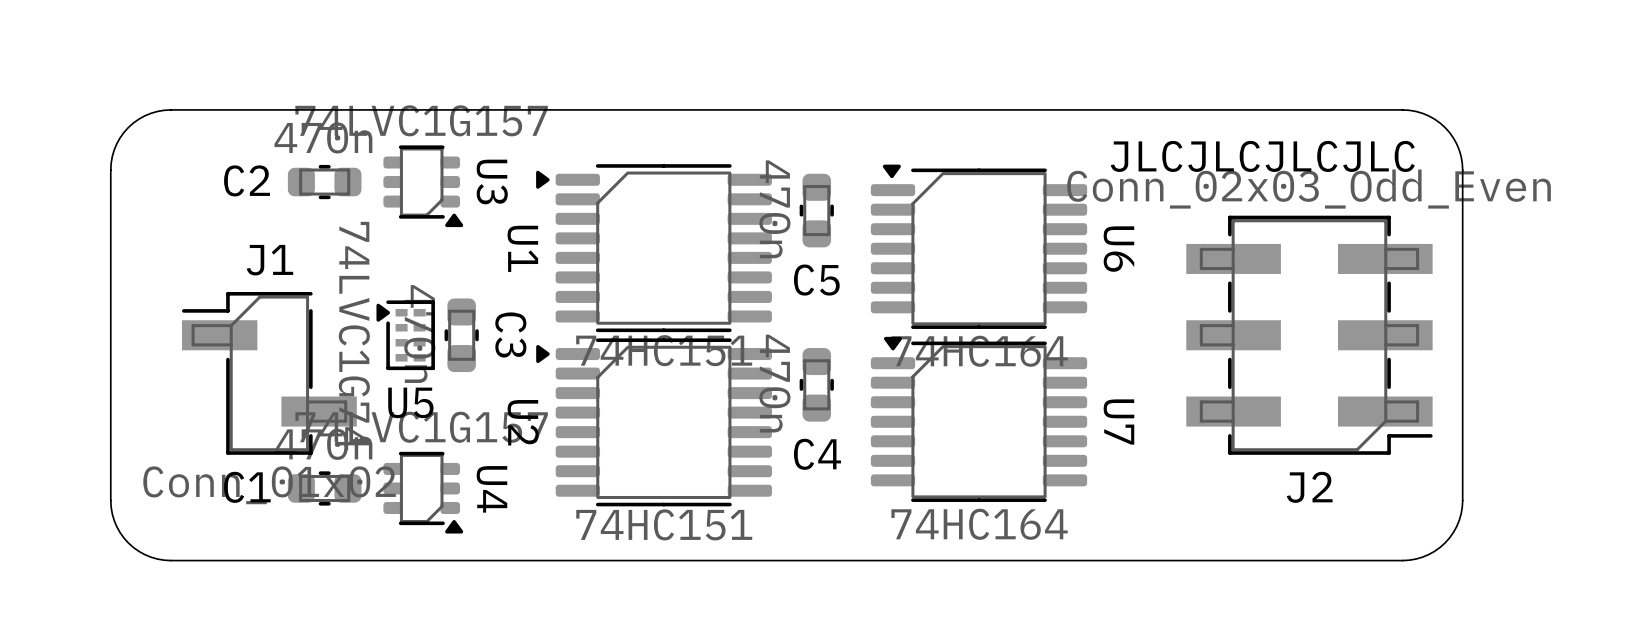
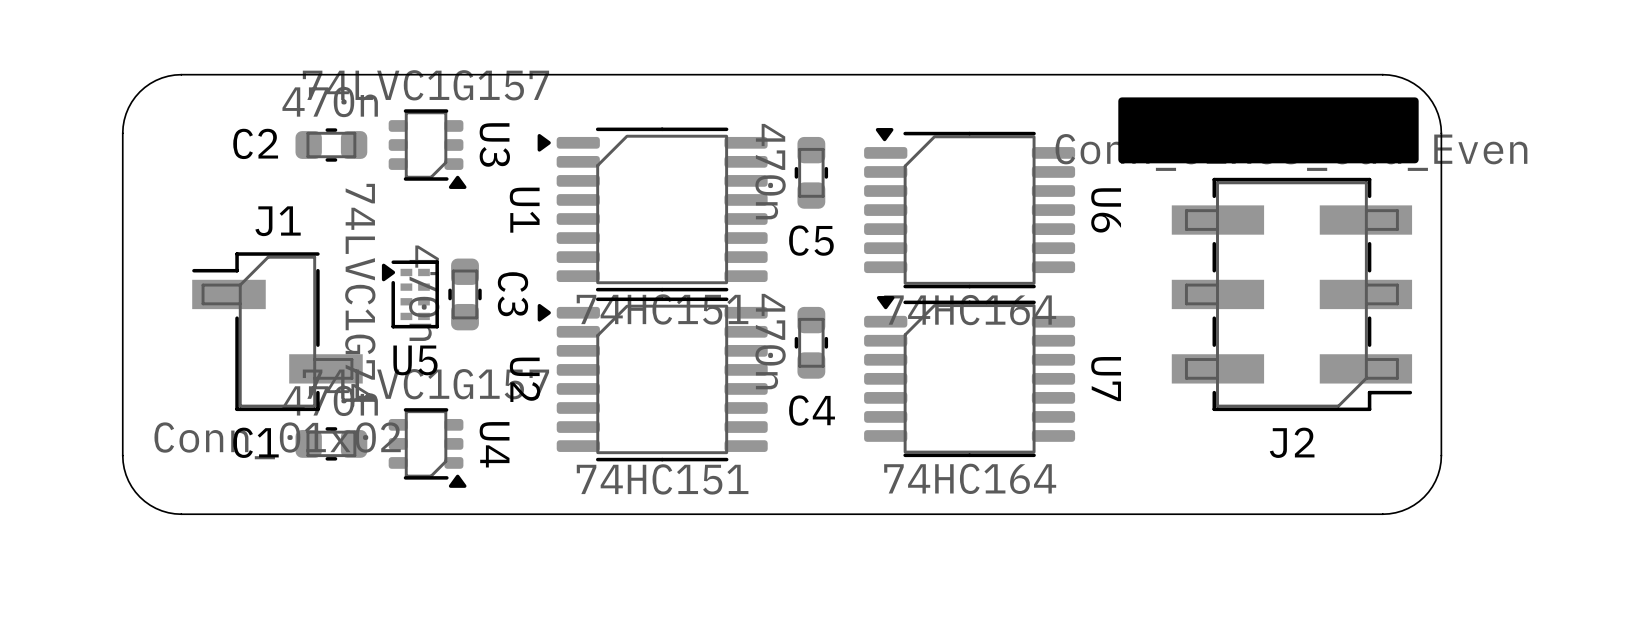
drawing: none -> [1118, 97, 1419, 164]
text: JLCJLCJLCJLC (1262, 156) -> none

